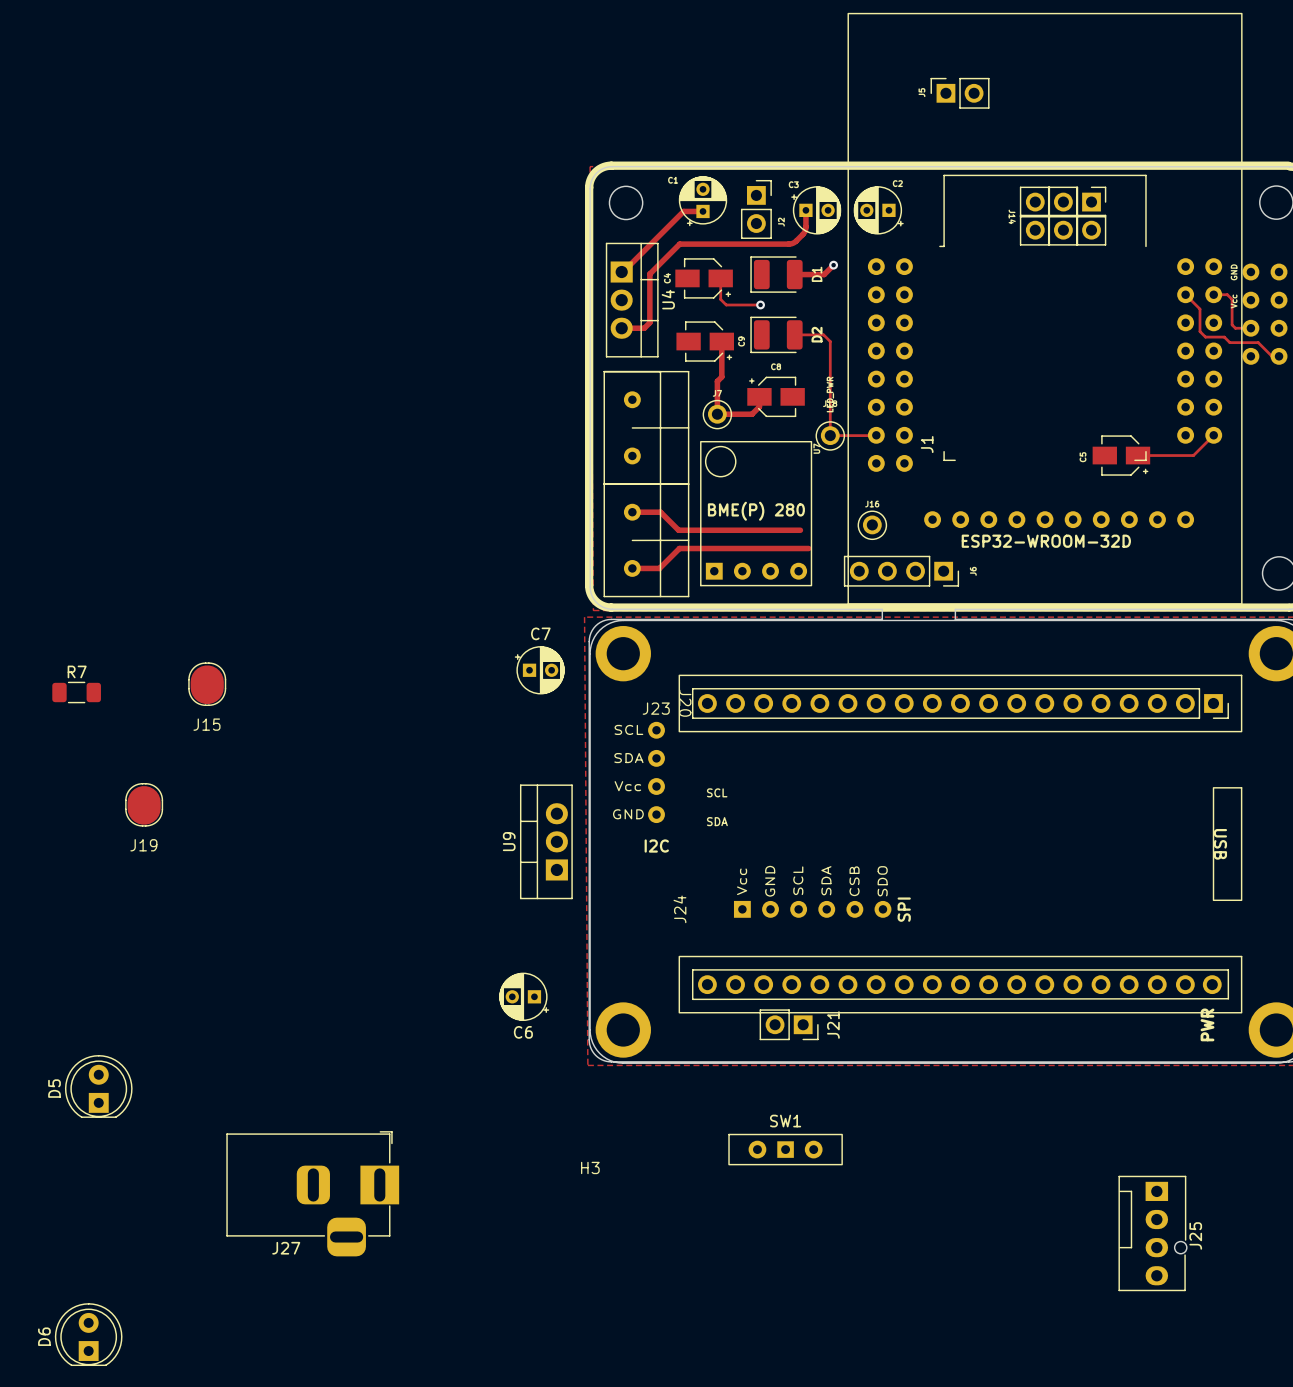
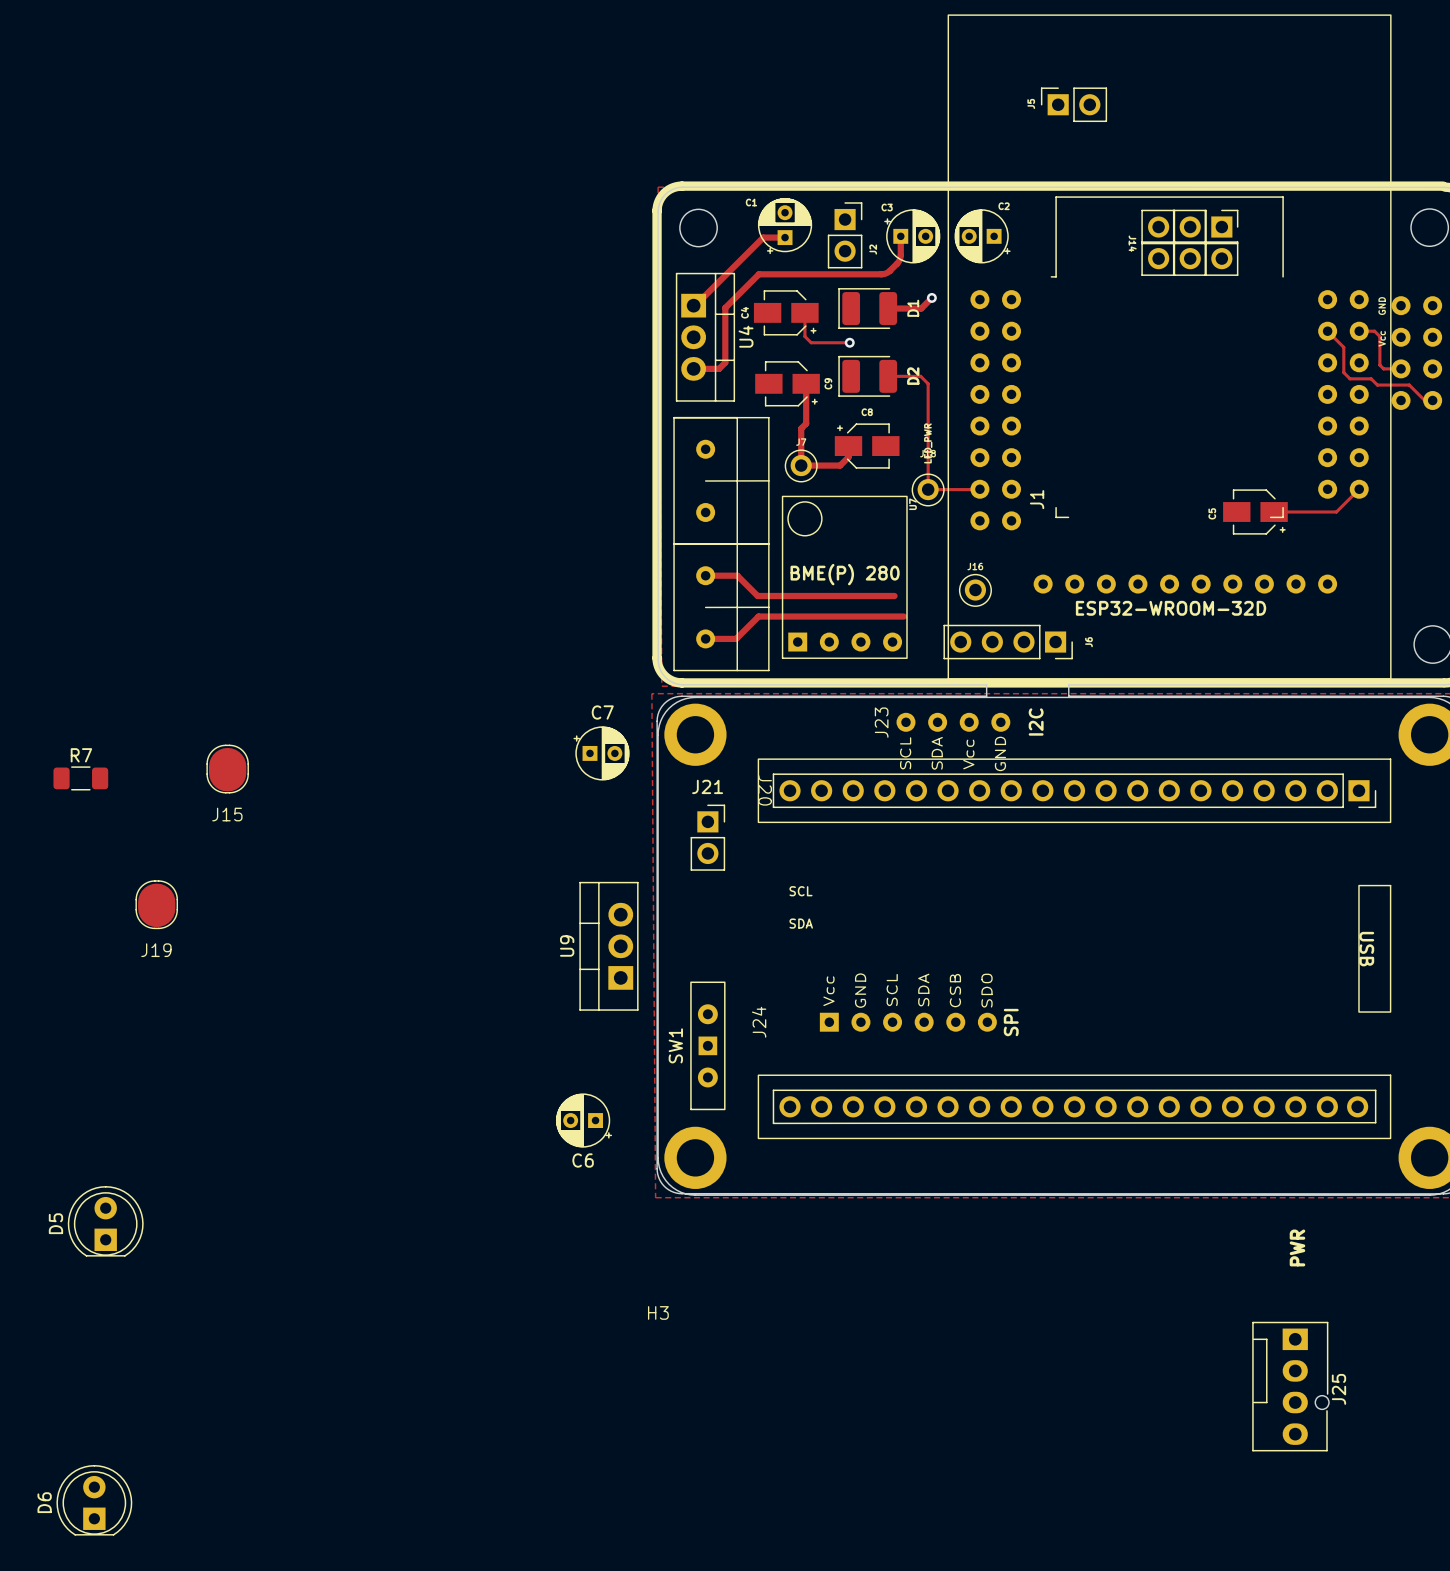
J23 rotation: 0° (656, 772) -> 90° counterclockwise (953, 722)
J23 position: (656, 772) -> (953, 722)
J21 rotation: 0° (789, 1024) -> 90° counterclockwise (707, 837)
J21 position: (789, 1024) -> (707, 837)
text position: PWR (1207, 1024) -> PWR (1297, 1247)
SW1 name position: SW1 (785, 1121) -> SW1 (675, 1045)
SW1 rotation: 0° (785, 1149) -> 90° clockwise (707, 1045)
SW1 position: (785, 1149) -> (707, 1045)
J27: (312, 1193) -> none

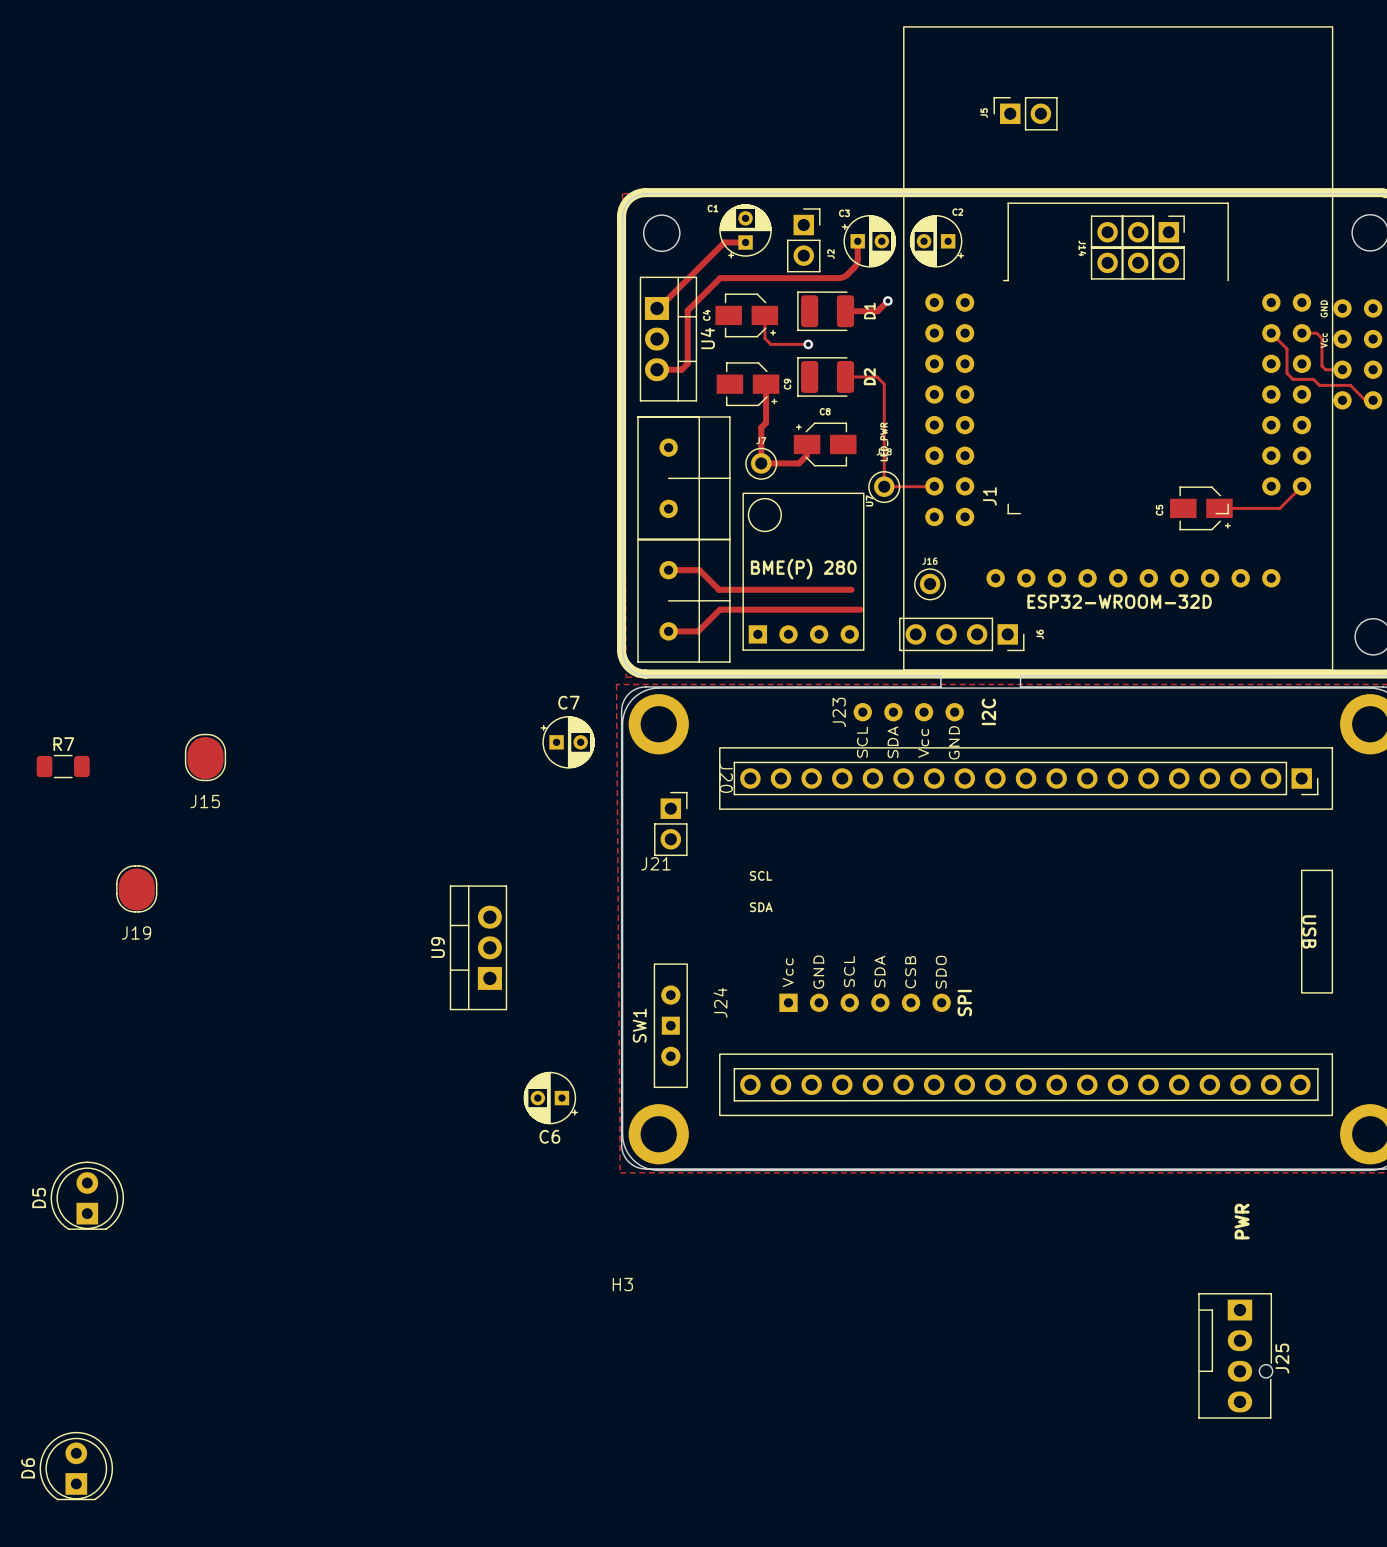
J21 name position: J21 (707, 786) -> J21 (655, 863)
U9 position: (608, 946) -> (478, 947)

